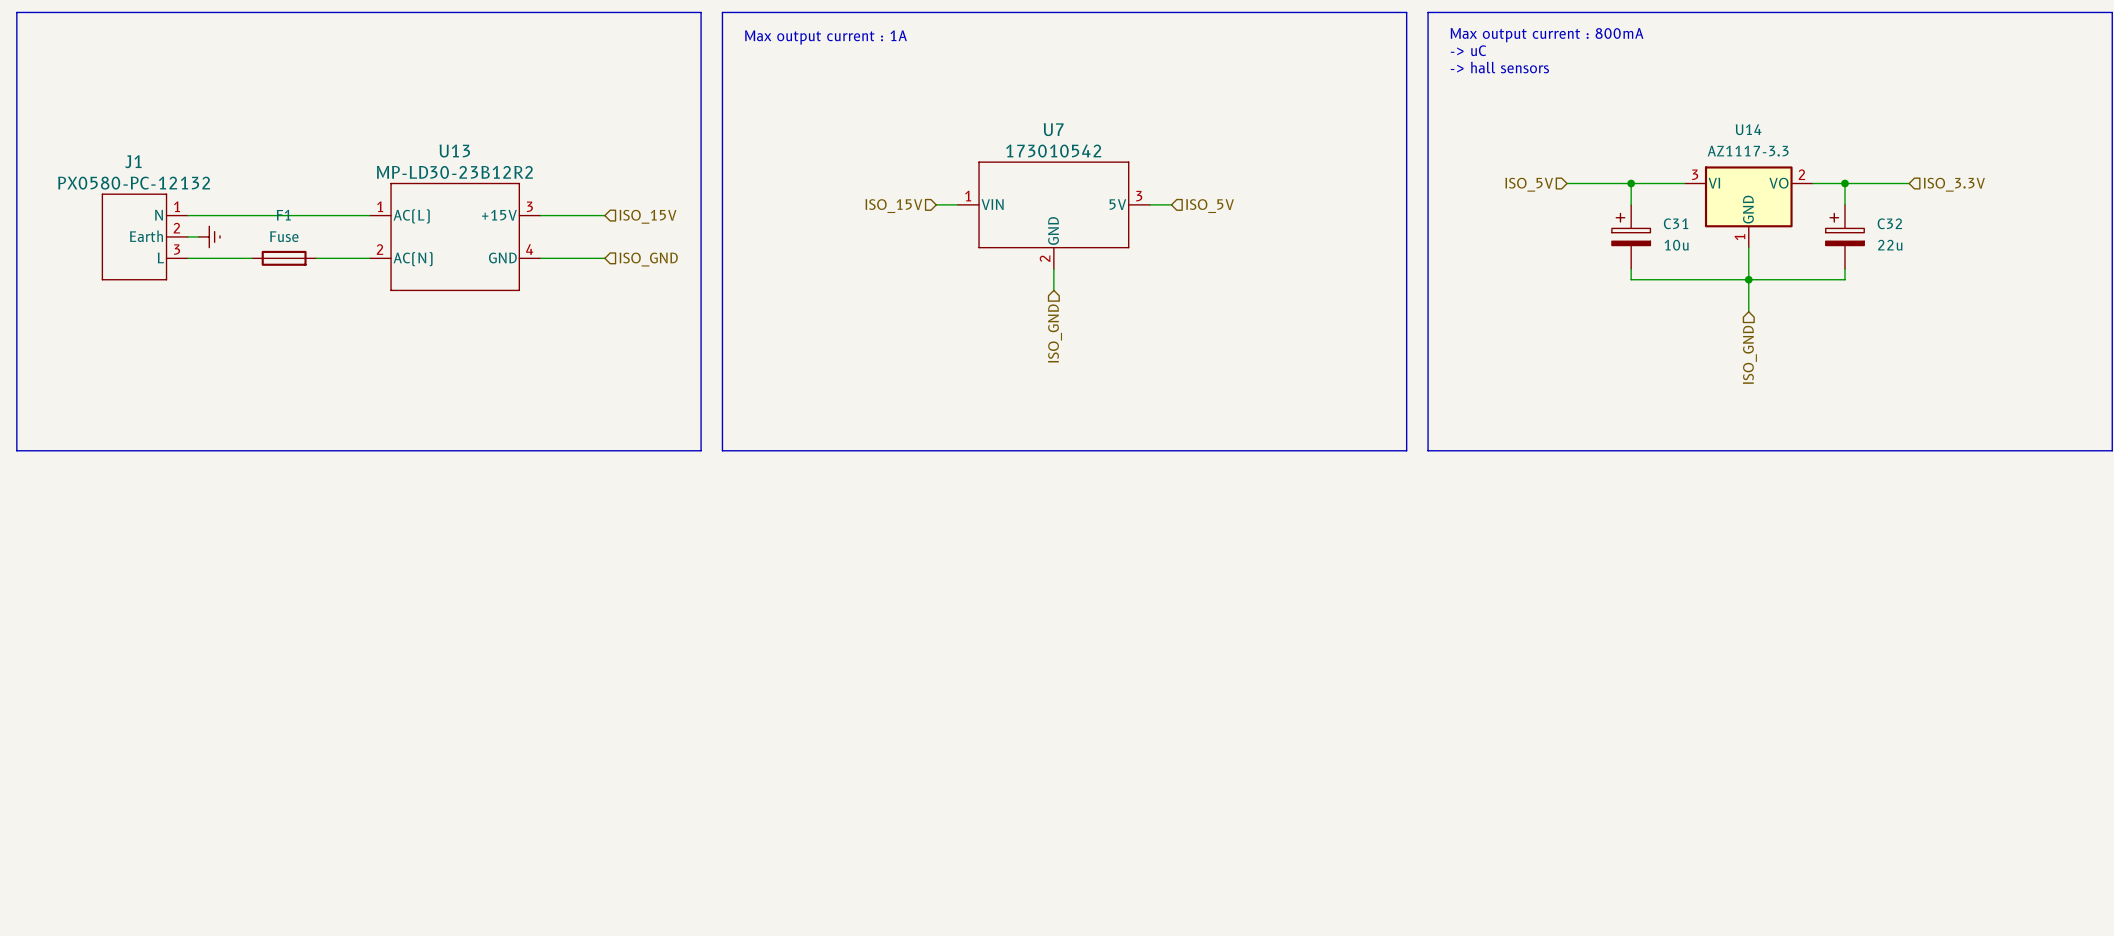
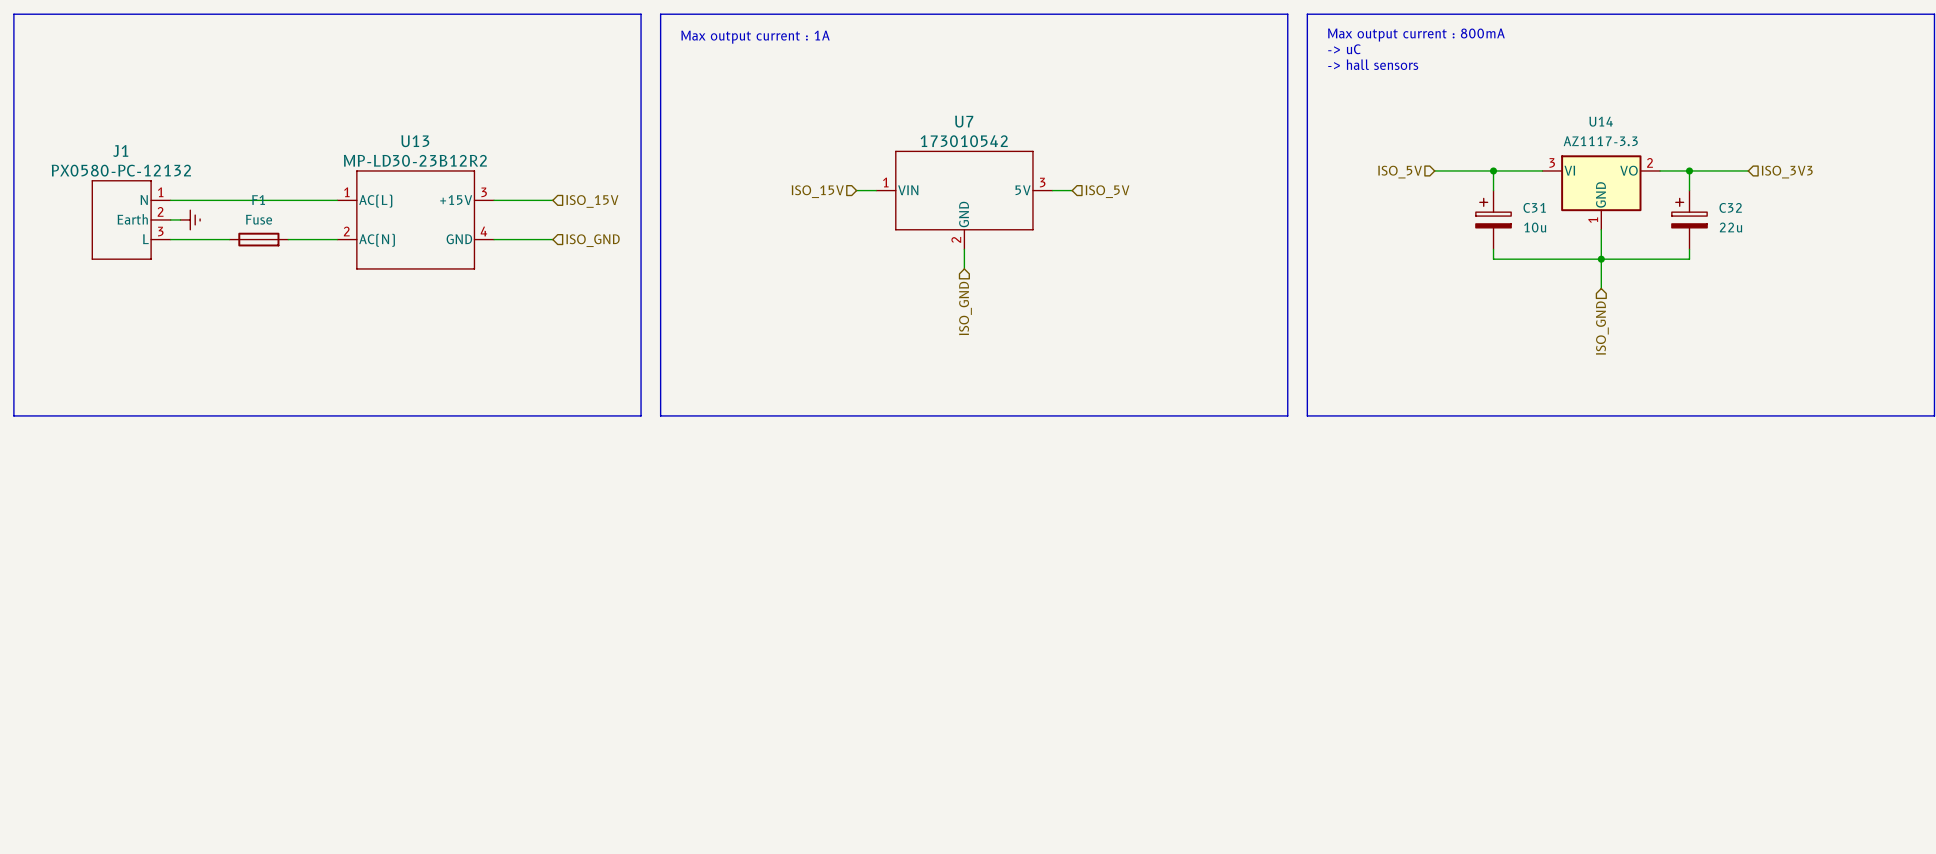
hierarchical label: ISO_3.3V (1954, 184) -> ISO_3V3 (1787, 172)

